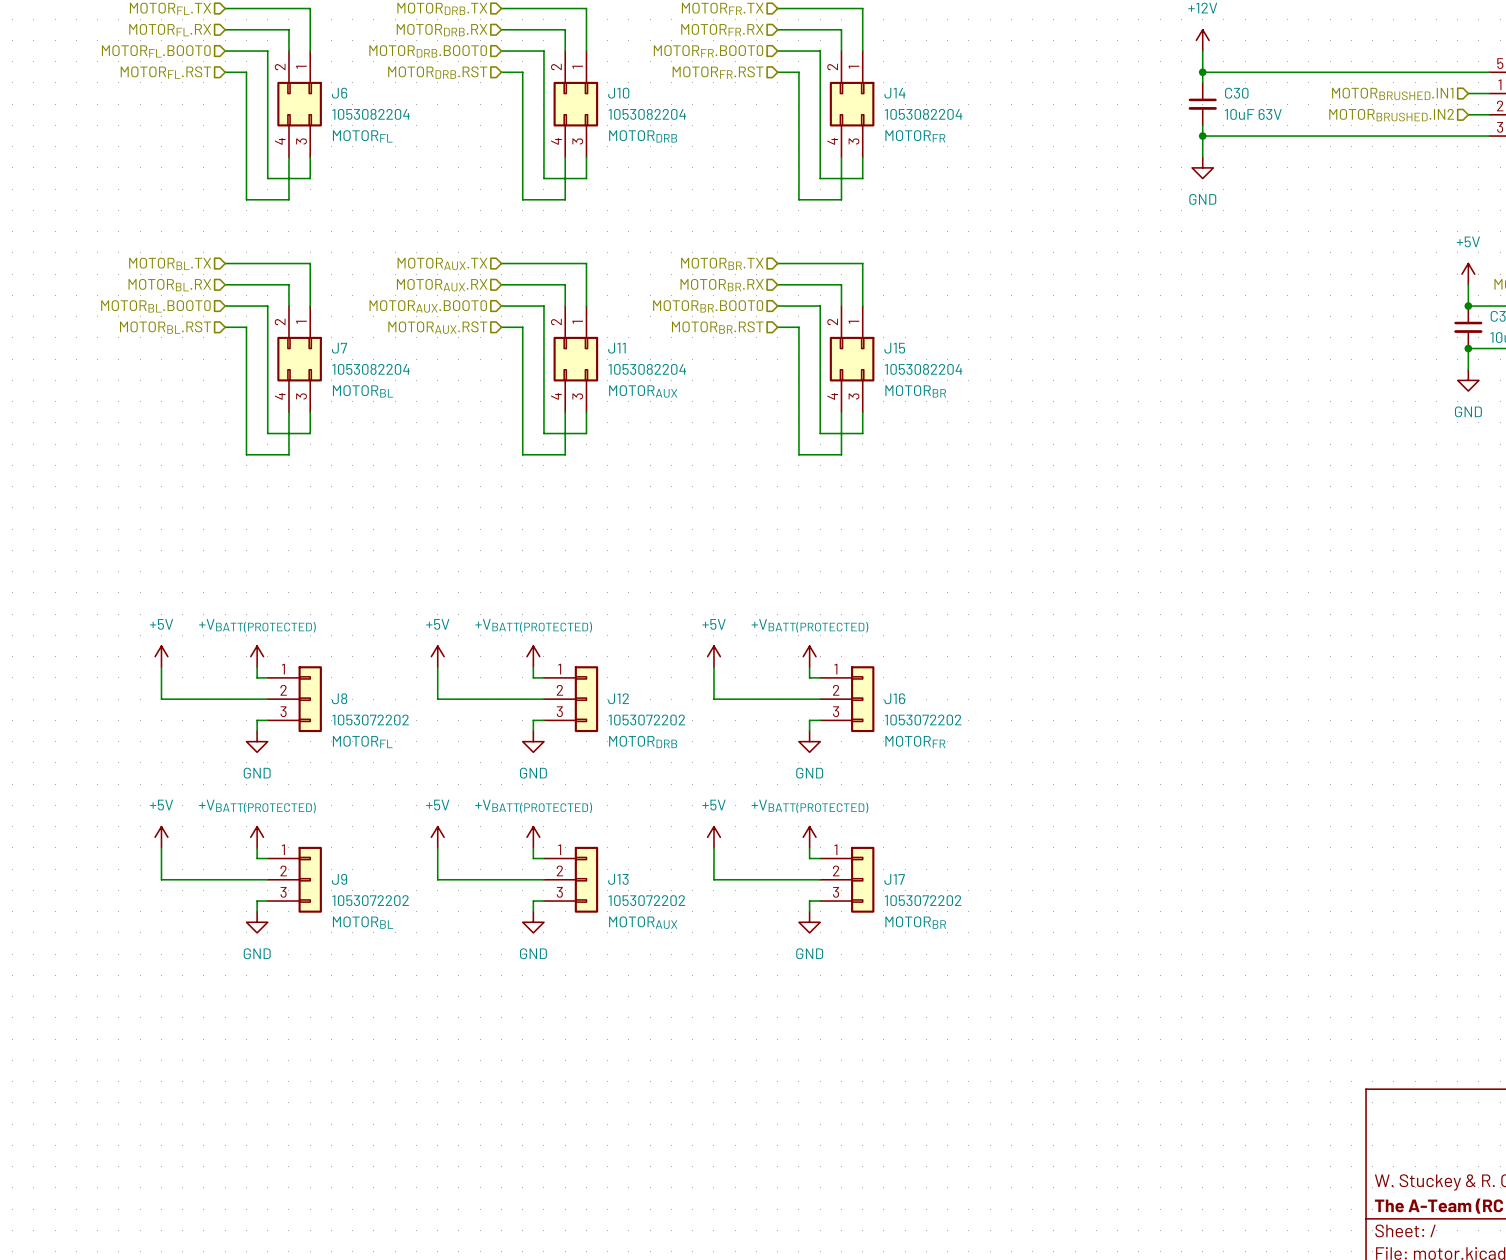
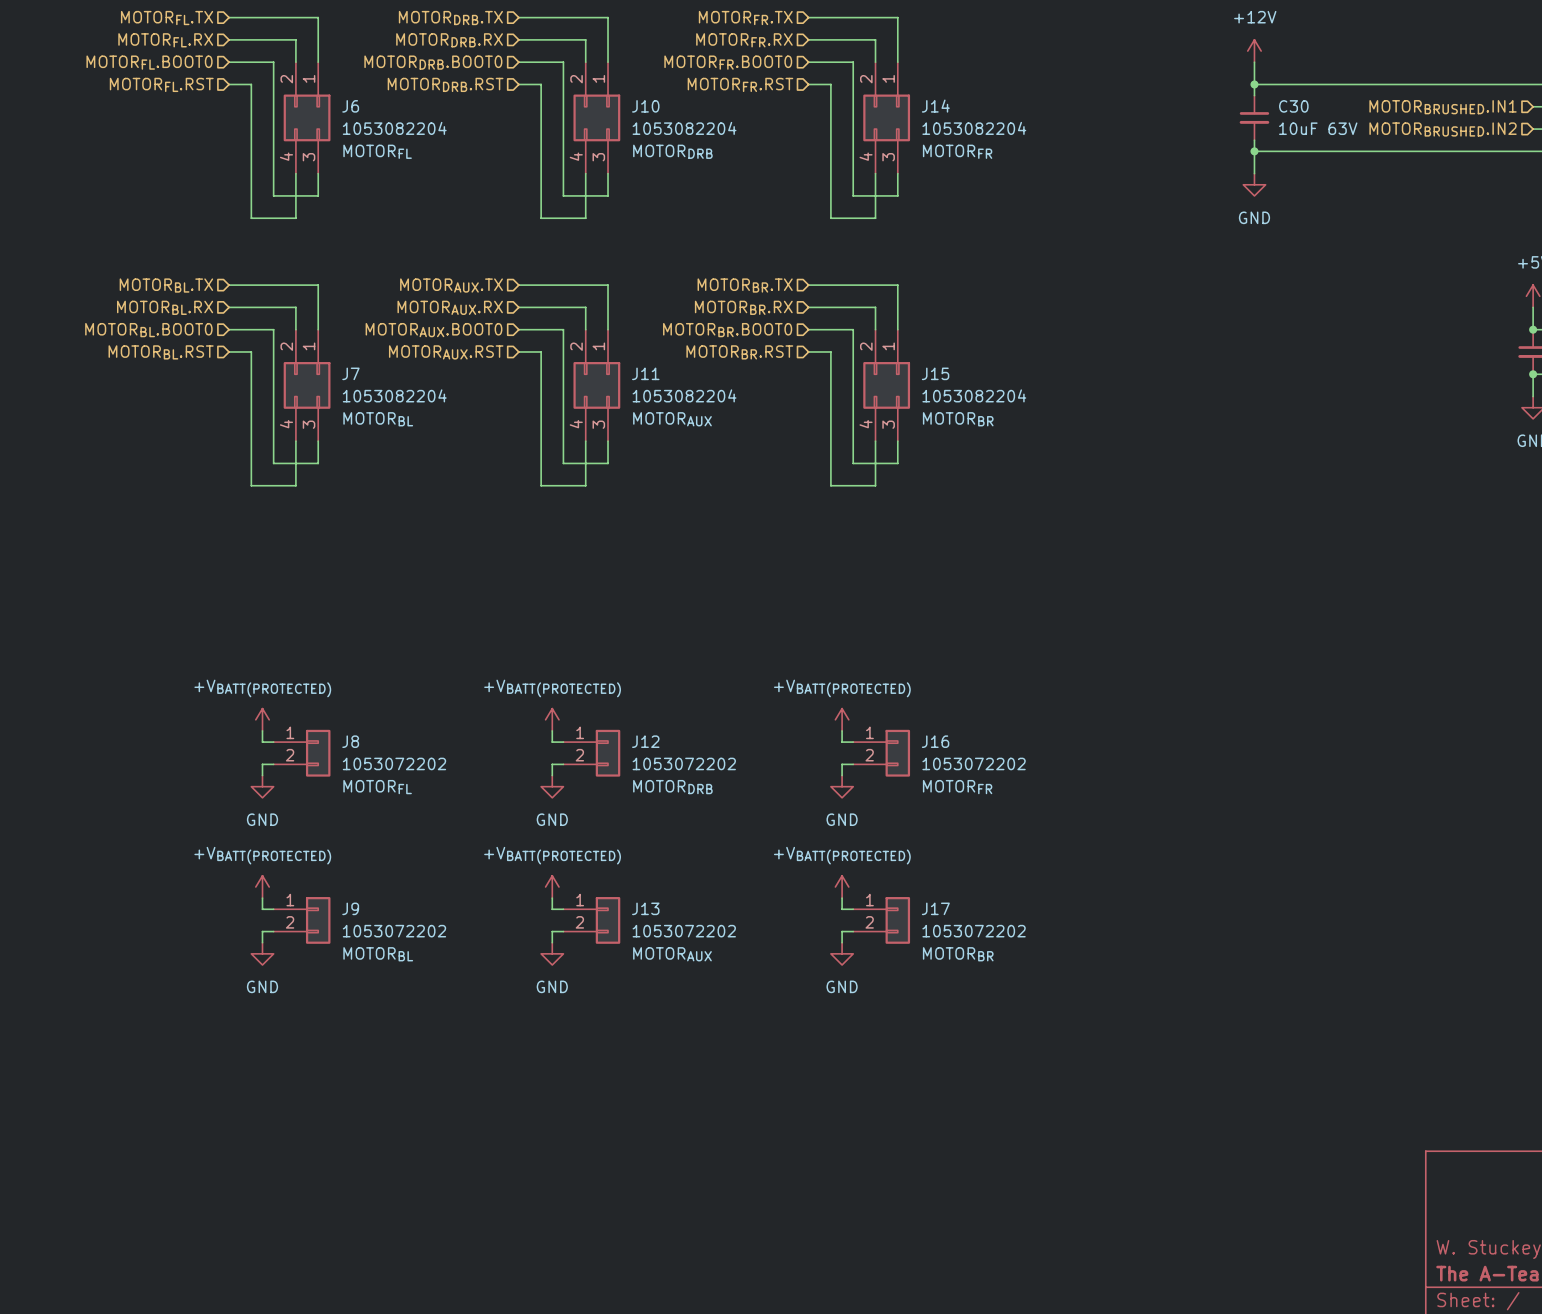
power symbol: +5V (161, 656) -> none
power symbol position: +VBATT(PROTECTED) (257, 656) -> +VBATT(PROTECTED) (262, 719)
power symbol: +5V (437, 656) -> none
power symbol position: +VBATT(PROTECTED) (533, 656) -> +VBATT(PROTECTED) (552, 719)
power symbol: +5V (713, 656) -> none
power symbol position: +VBATT(PROTECTED) (809, 656) -> +VBATT(PROTECTED) (842, 719)
J8 symbol: [267, 666, 322, 733] -> [273, 729, 331, 777]
J12 symbol: [543, 666, 599, 733] -> [563, 729, 621, 777]
J16 symbol: [820, 666, 875, 733] -> [853, 729, 911, 777]
wire: (161, 667) (161, 699) (257, 699) -> (262, 730) (262, 742)
wire: (257, 667) (257, 677) (267, 677) -> none
wire: (437, 667) (437, 699) (533, 699) -> (552, 730) (552, 742)
wire: (533, 667) (533, 677) (543, 677) -> none
wire: (713, 667) (713, 699) (809, 699) -> (842, 730) (842, 742)
wire: (809, 667) (809, 677) (820, 677) -> none
power symbol: +5V (161, 837) -> none
power symbol: +5V (437, 837) -> none
power symbol: +5V (713, 837) -> none
J9 symbol: [267, 846, 322, 913] -> [273, 897, 331, 944]
J13 symbol: [543, 846, 599, 913] -> [563, 897, 621, 944]
J17 symbol: [820, 846, 875, 913] -> [853, 897, 911, 944]
wire: (161, 847) (161, 879) (257, 879) -> (262, 942) (262, 931)
wire: (437, 847) (437, 879) (533, 879) -> (552, 942) (552, 931)
wire: (713, 847) (713, 879) (809, 879) -> (842, 942) (842, 931)
power symbol position: GND (257, 922) -> GND (262, 953)
power symbol position: GND (533, 922) -> GND (552, 953)
power symbol position: GND (809, 922) -> GND (842, 953)

